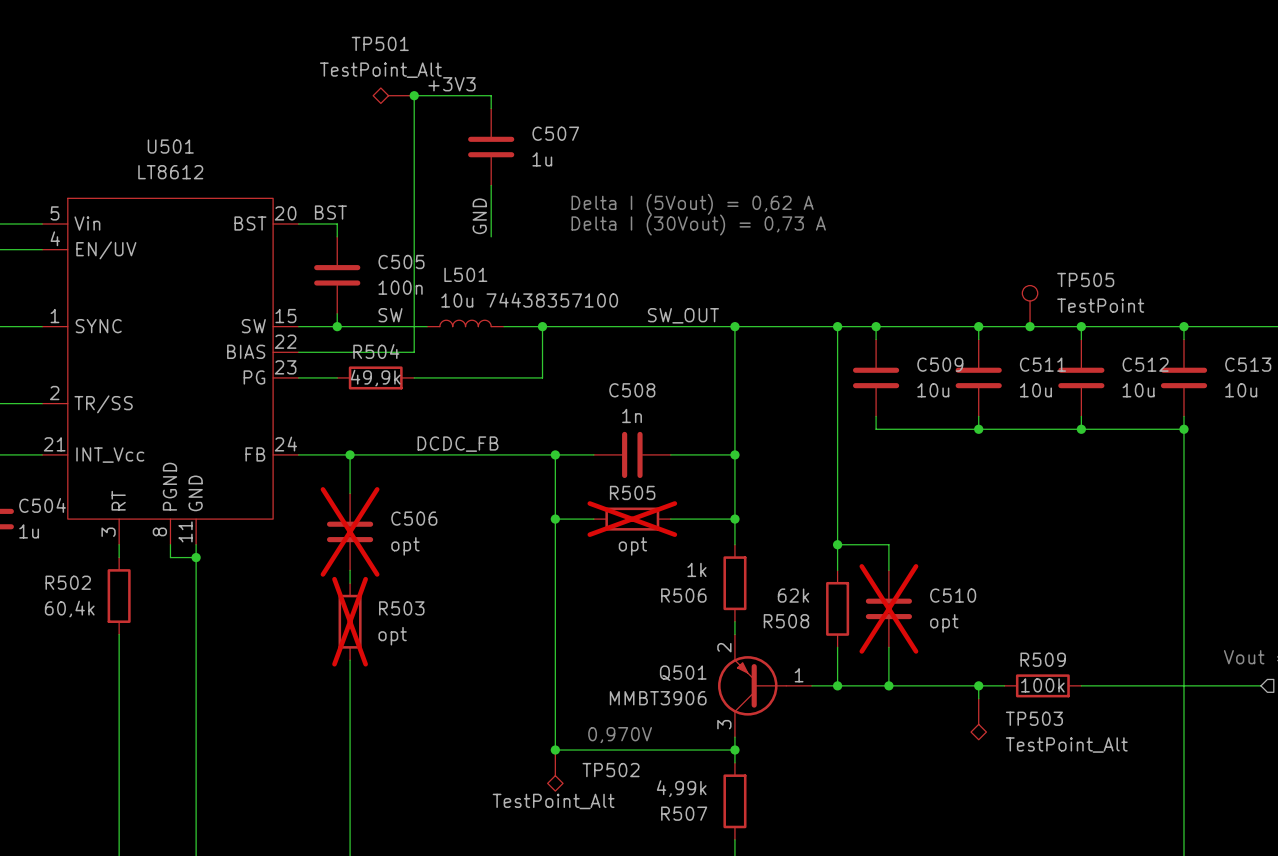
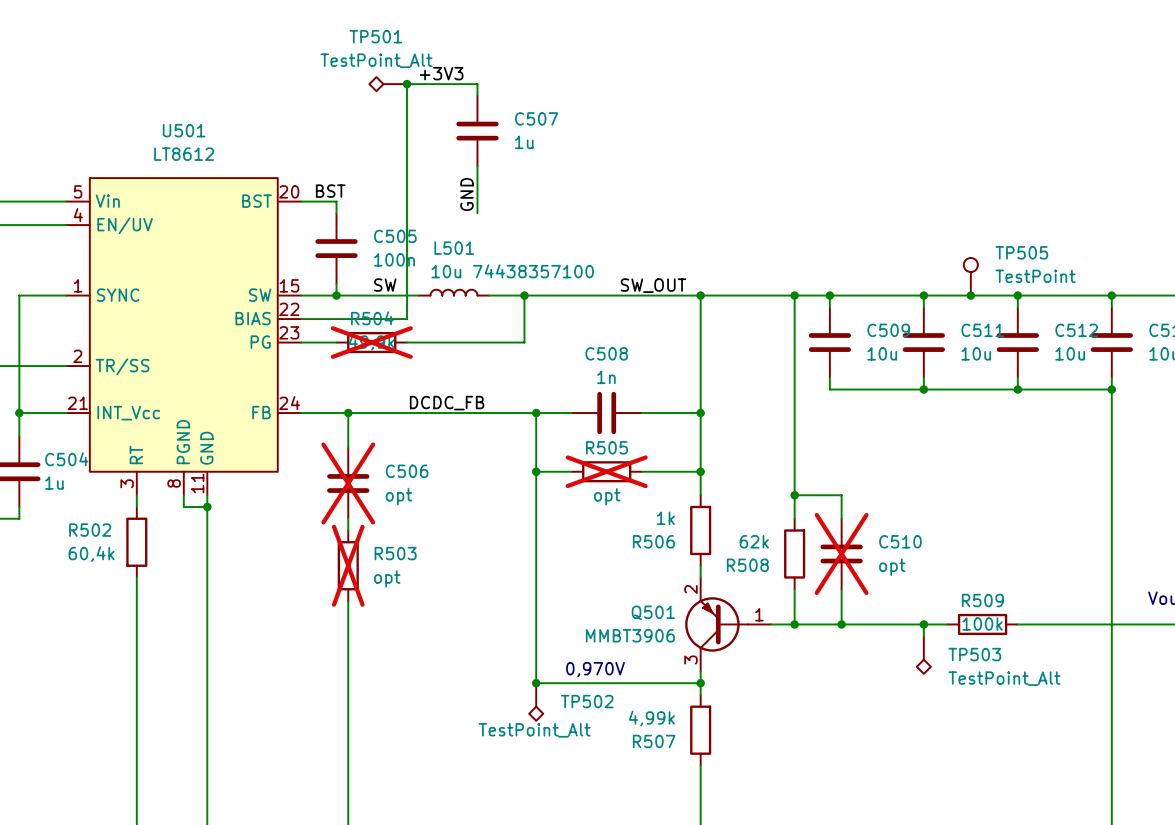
text: Delta I (5Vout) = 0,62 A (692, 204) -> none
text: Delta I (30Vout) = 0,73 A (698, 225) -> none
R504 do-not-place cross: none -> (371, 342)

